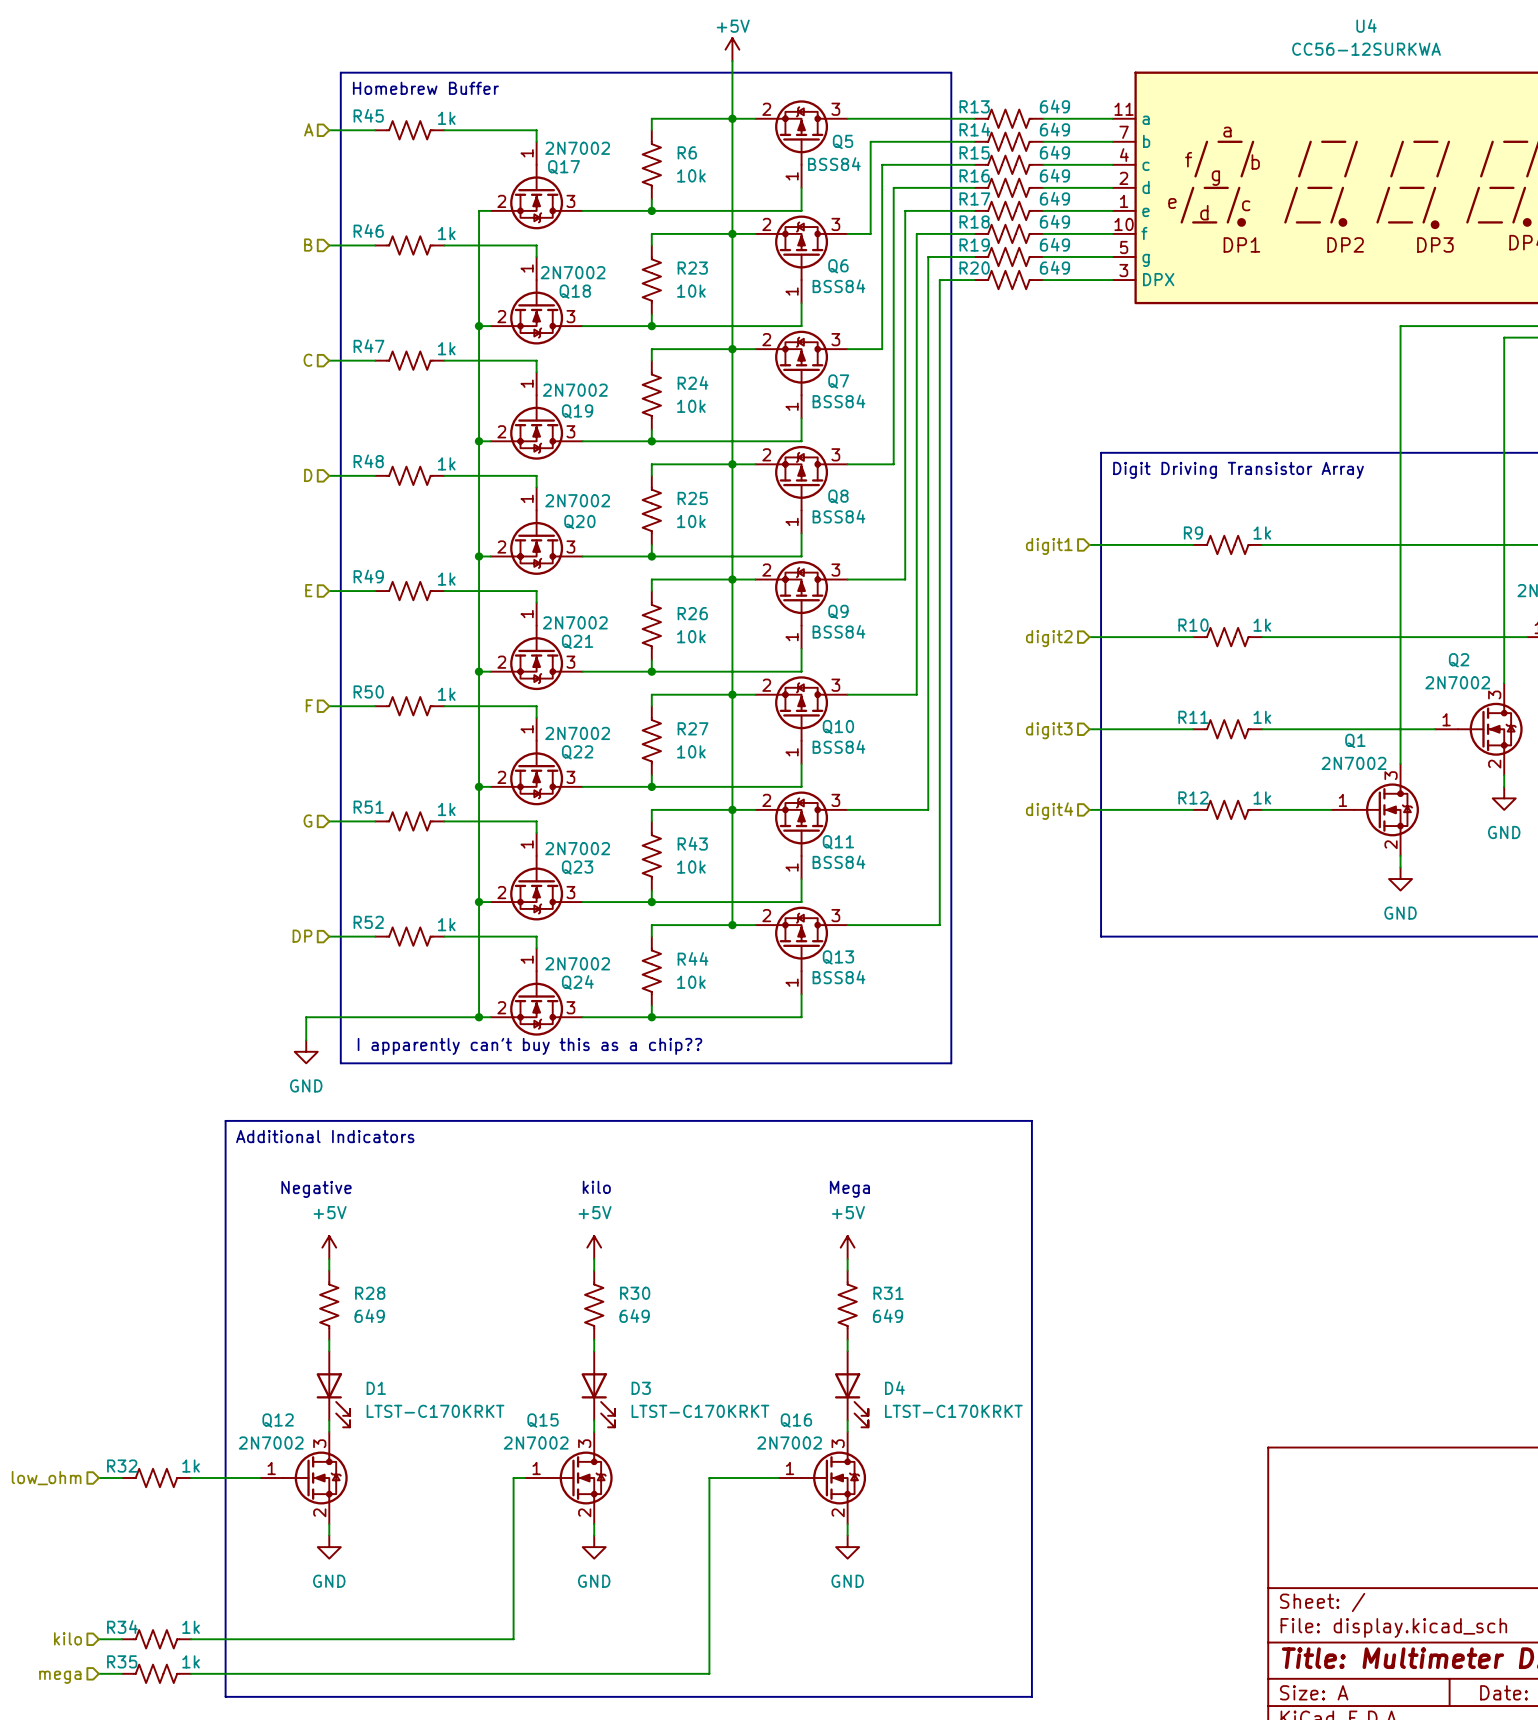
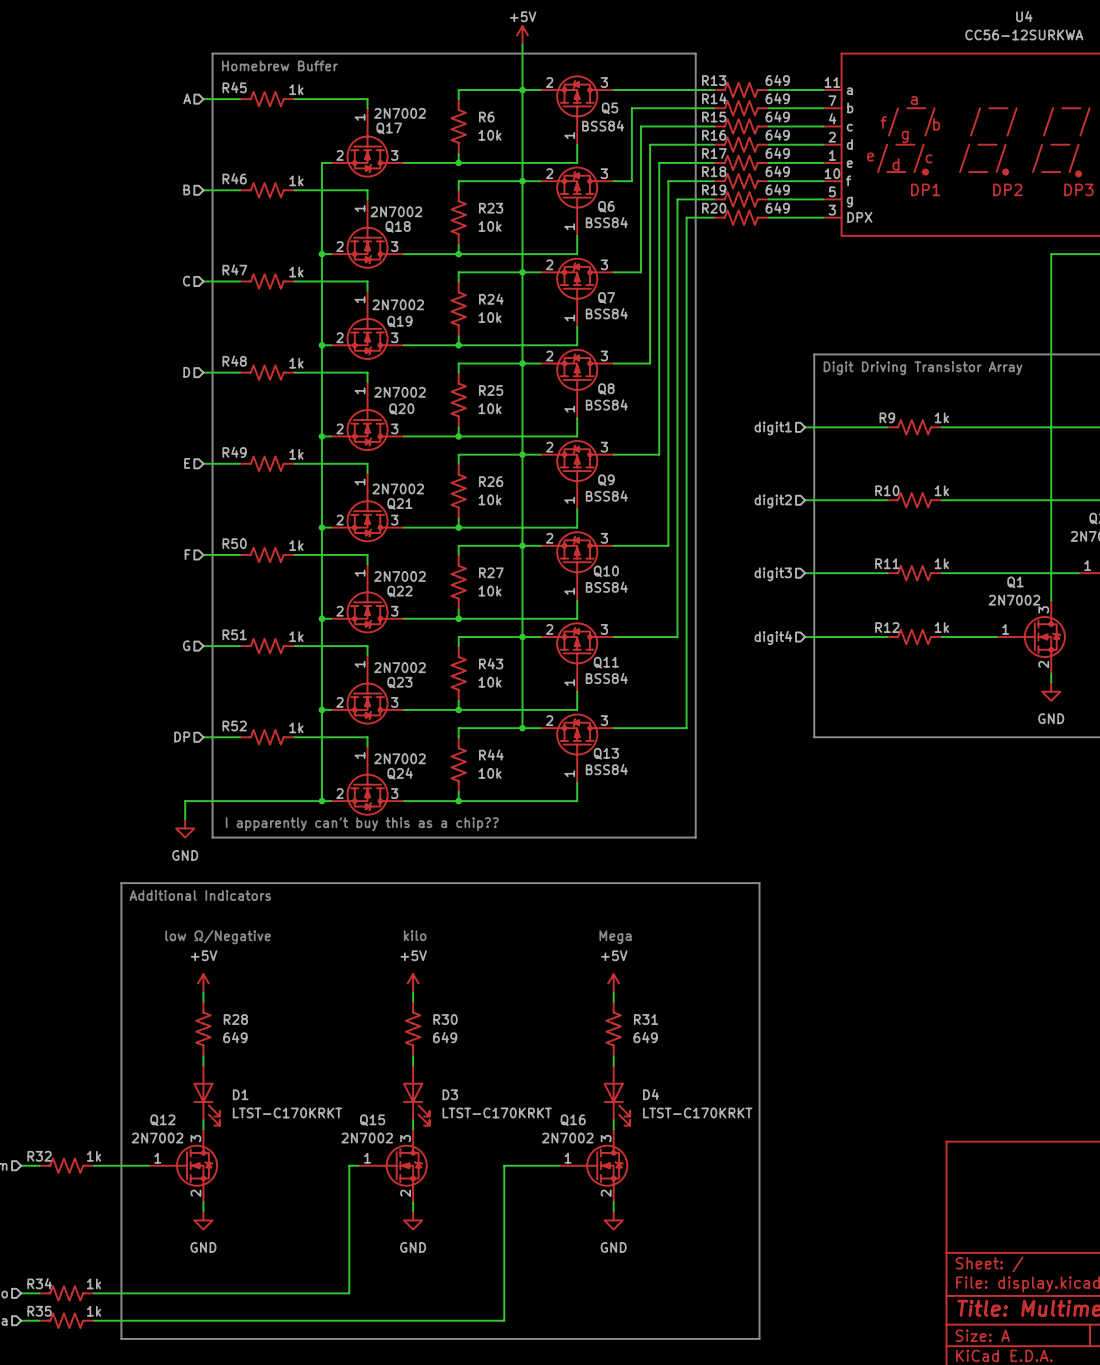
text: Negative (316, 1189) -> low Ω/Negative (218, 937)

